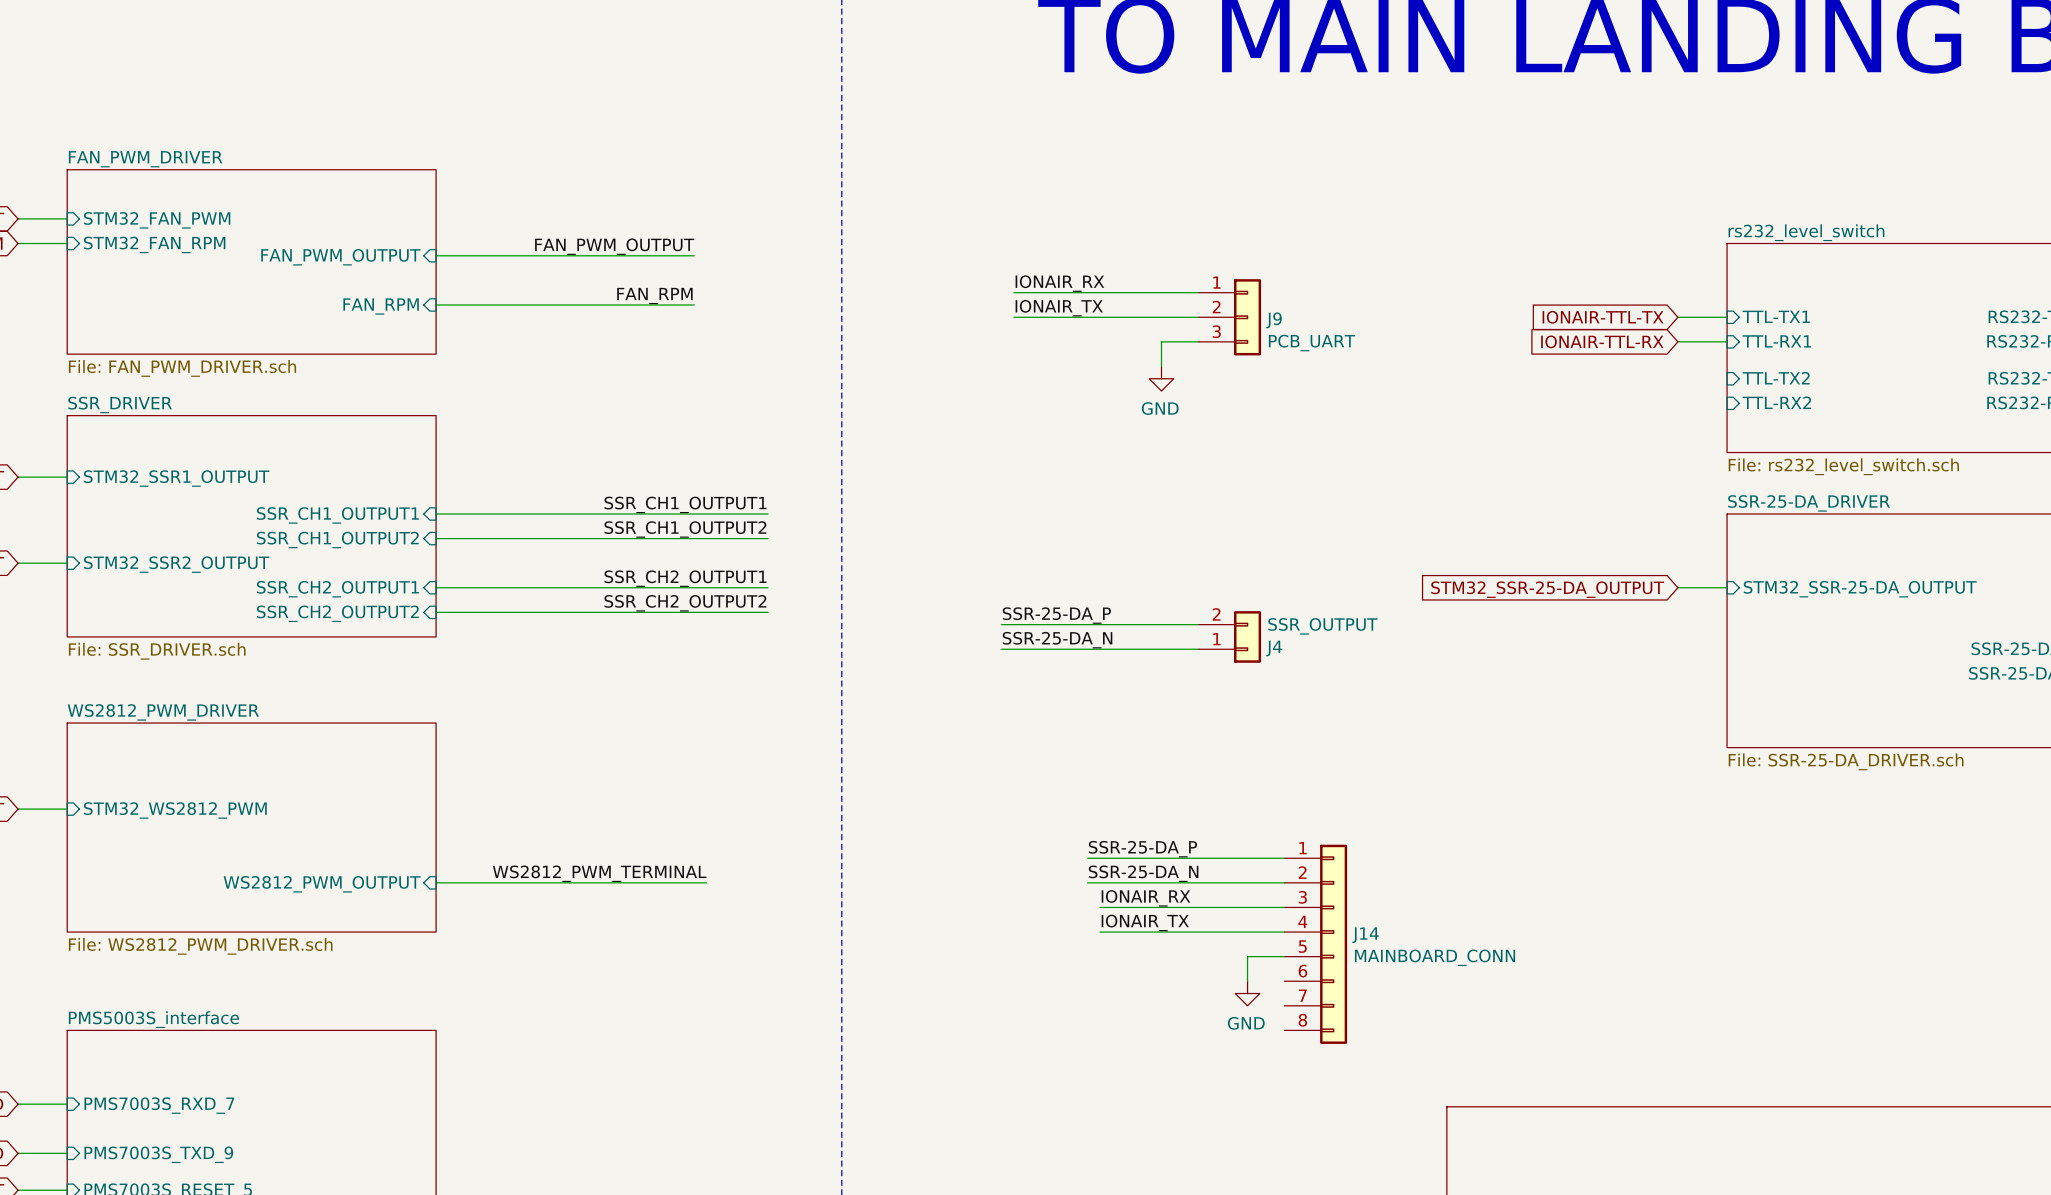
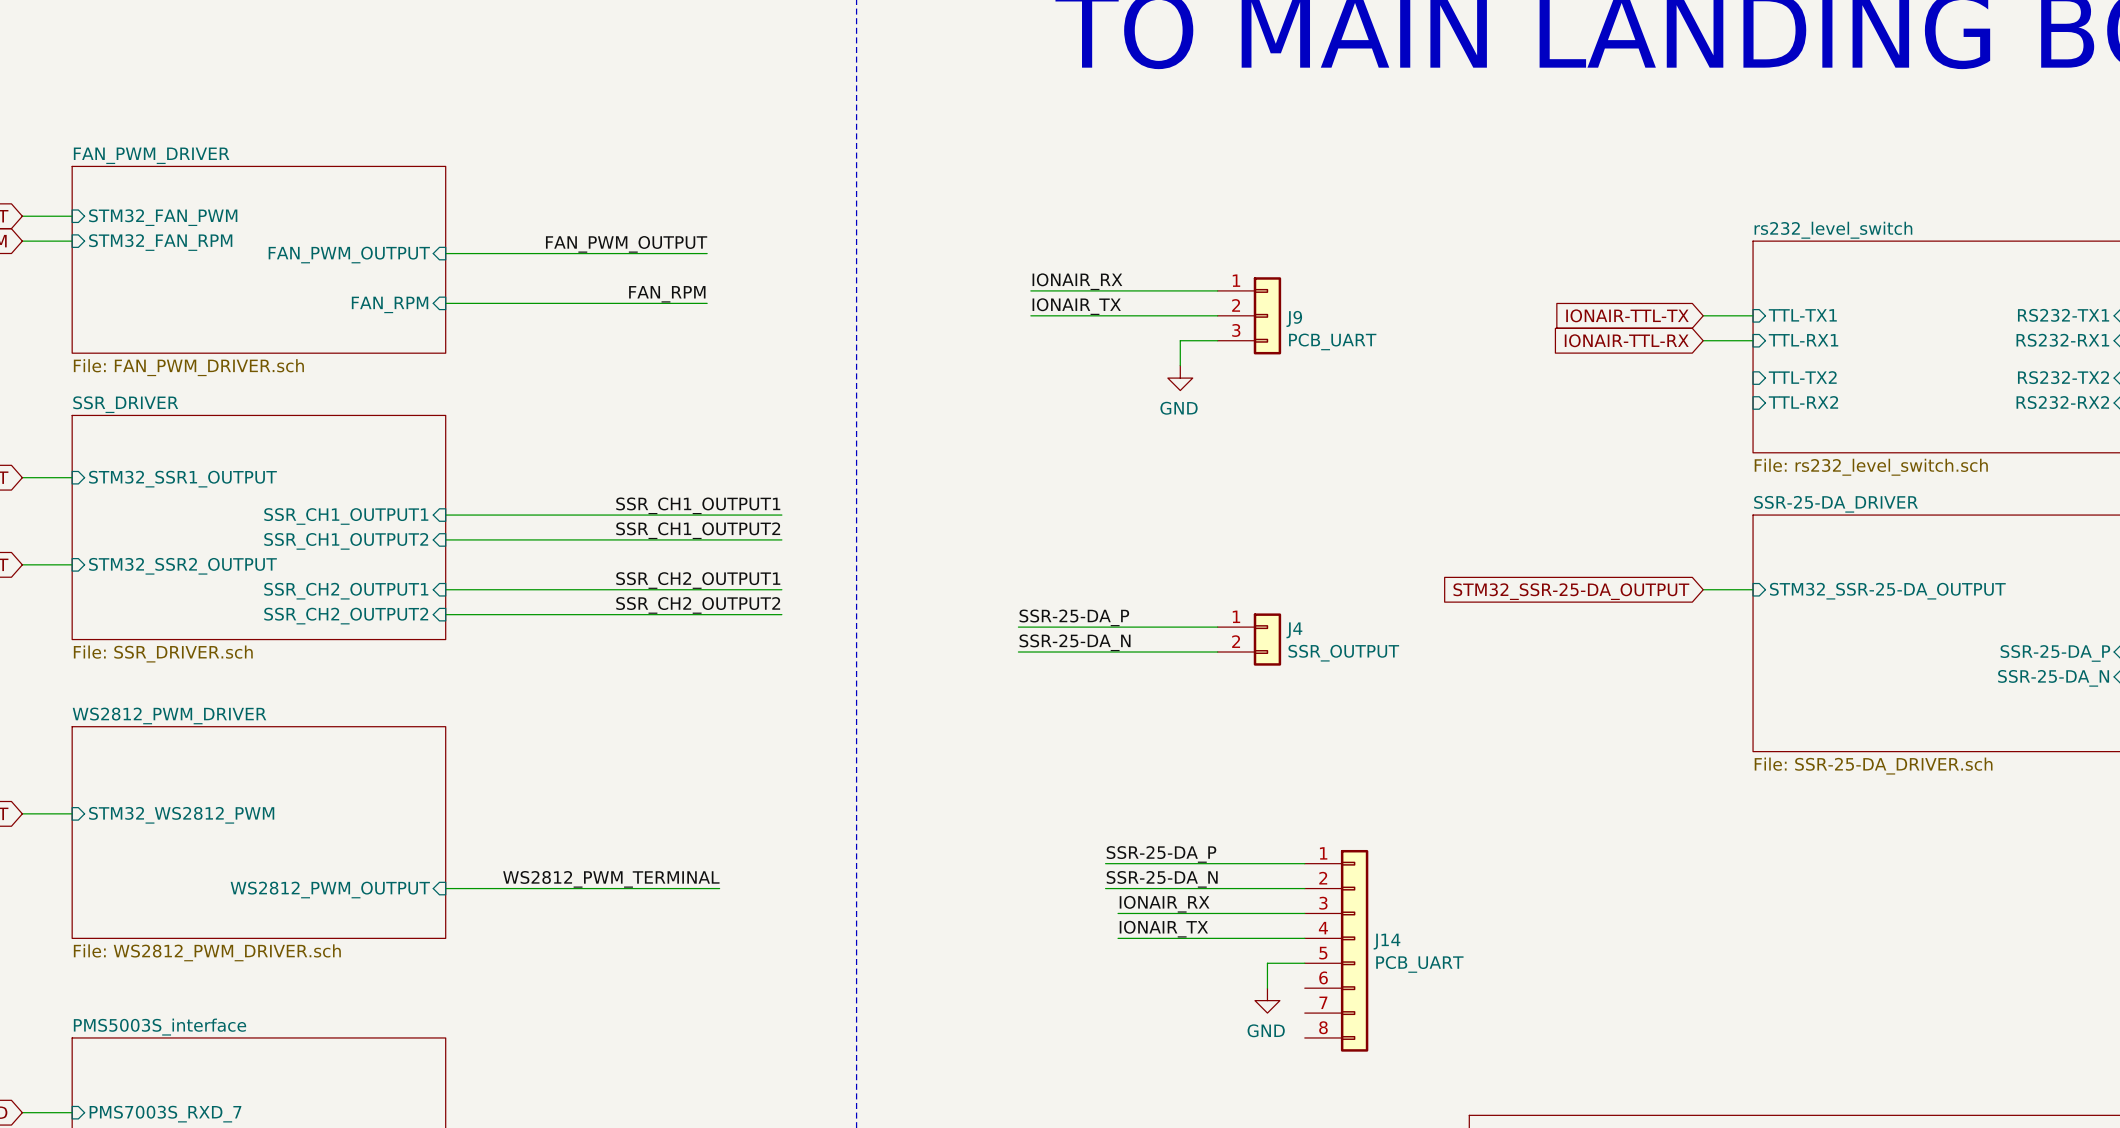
J4 flip: as is (1247, 636) -> up-down (1267, 639)
J14 value: MAINBOARD_CONN (1435, 957) -> PCB_UART (1419, 964)

